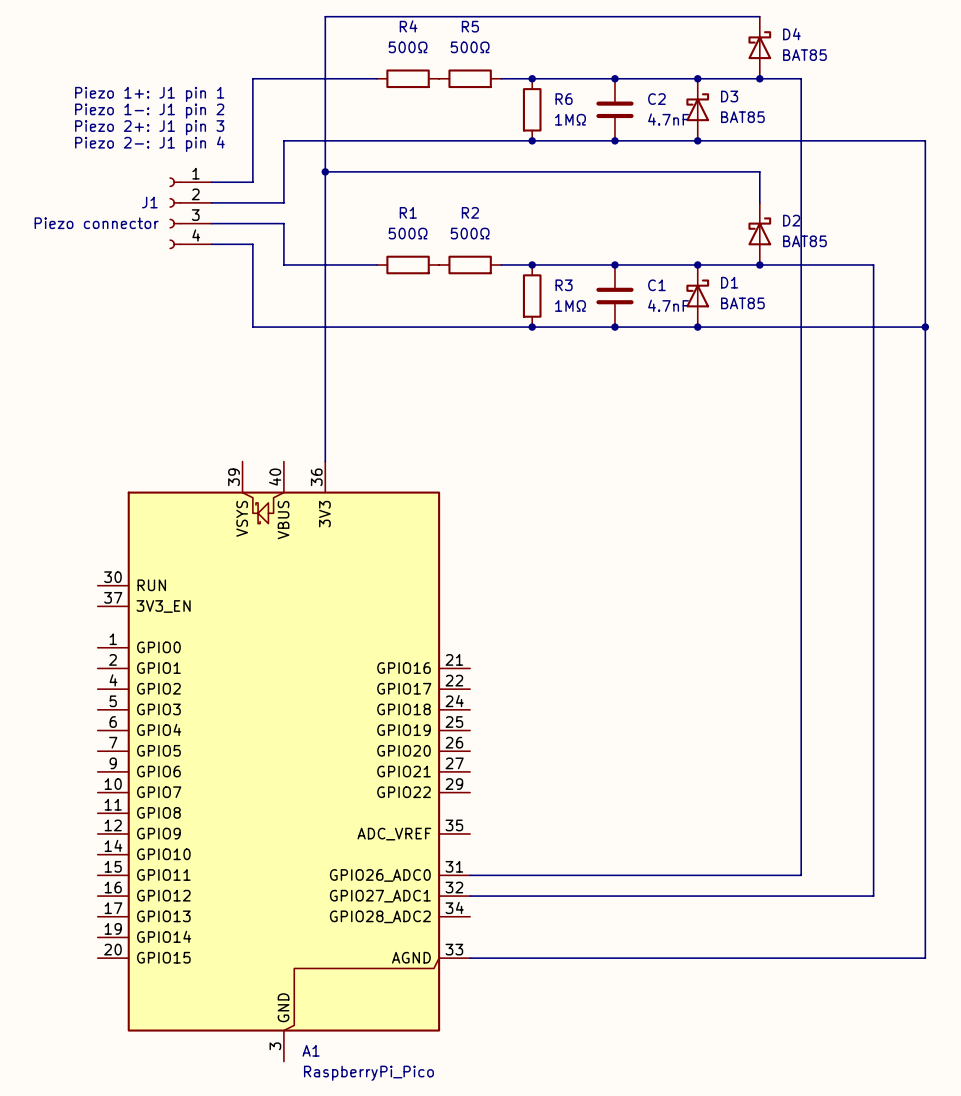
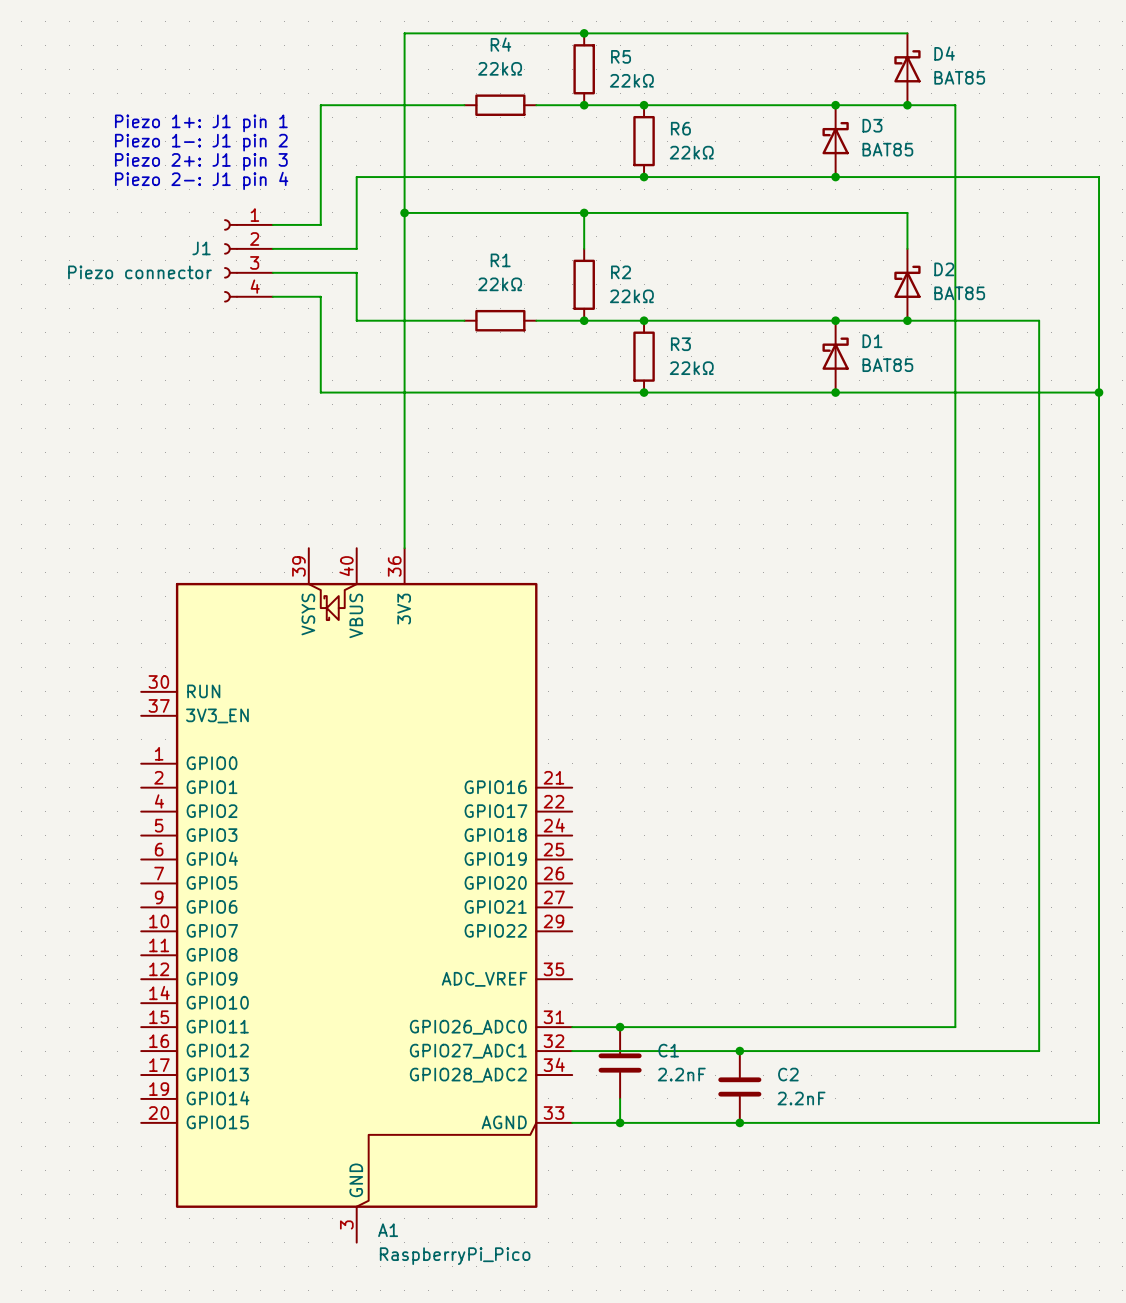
junction: none -> (584, 33)
R5 name position: R5 (470, 26) -> R5 (621, 56)
R4 value: 500Ω (408, 47) -> 22kΩ (500, 68)
R5 value: 500Ω (470, 47) -> 22kΩ (631, 80)
wire: none -> (536, 105) (608, 105)
R5 rotation: 0° (470, 78) -> 90° clockwise (584, 69)
junction: none -> (584, 105)
junction: (614, 78) -> none
C2 position: (614, 109) -> (739, 1086)
R6 value: 1MΩ (570, 119) -> 22kΩ (691, 152)
C2 value: 4.7nF (668, 119) -> 2.2nF (801, 1098)
junction: (614, 140) -> none
wire: none -> (584, 212) (584, 248)
junction: none -> (584, 212)
R2 name position: R2 (470, 212) -> R2 (621, 272)
R1 value: 500Ω (408, 233) -> 22kΩ (500, 284)
R2 value: 500Ω (470, 233) -> 22kΩ (631, 296)
wire: none -> (536, 320) (608, 320)
R2 rotation: 0° (470, 264) -> 90° clockwise (584, 284)
junction: none -> (584, 320)
junction: (614, 264) -> none
C1 position: (614, 296) -> (620, 1063)
R3 value: 1MΩ (570, 305) -> 22kΩ (691, 368)
C1 value: 4.7nF (668, 305) -> 2.2nF (681, 1074)
junction: (614, 327) -> none
junction: none -> (620, 1027)
junction: none -> (739, 1051)
wire: none -> (620, 1098) (620, 1122)
junction: none -> (620, 1122)
junction: none -> (739, 1122)

